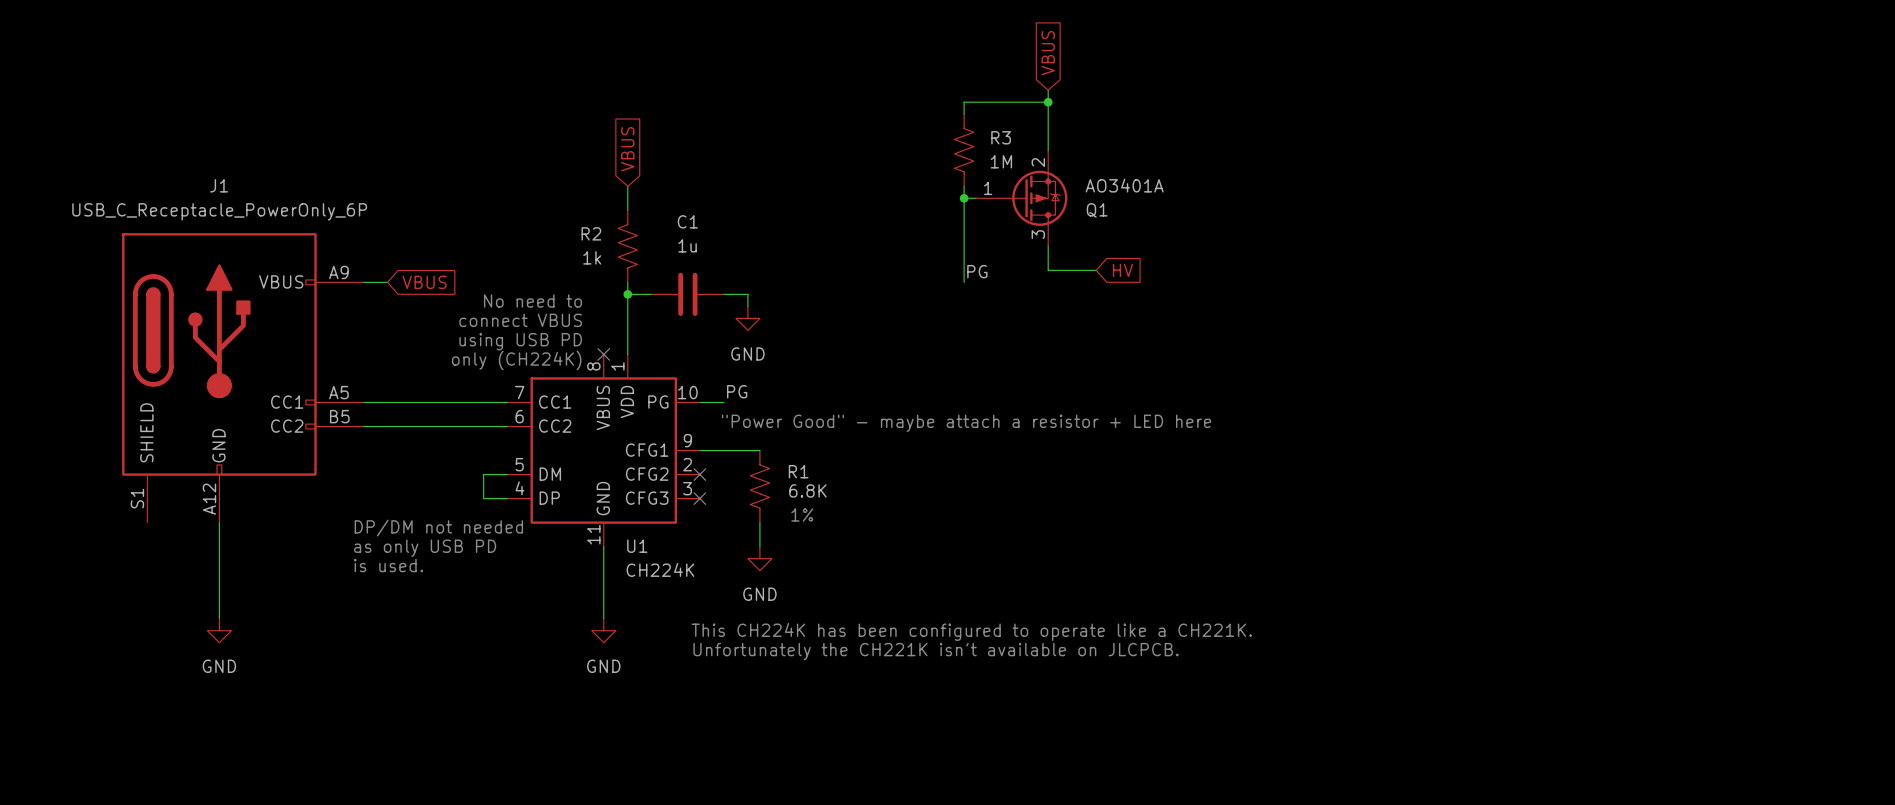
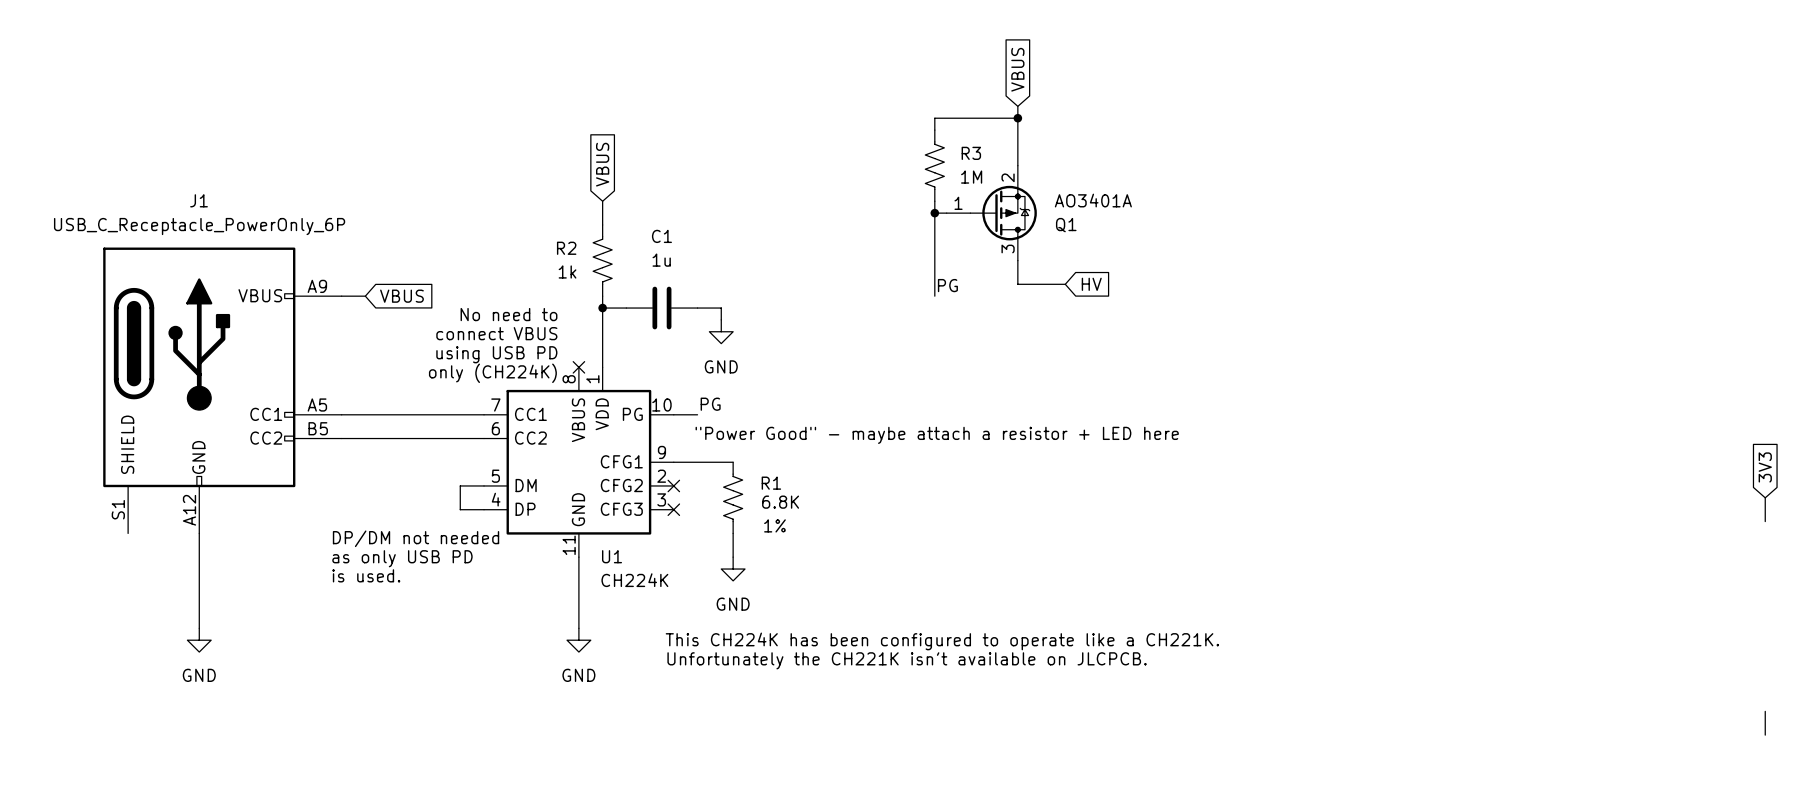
global label: none -> 3V3 (1765, 467)
wire: none -> (1765, 497) (1765, 521)
wire: none -> (1765, 711) (1765, 735)

